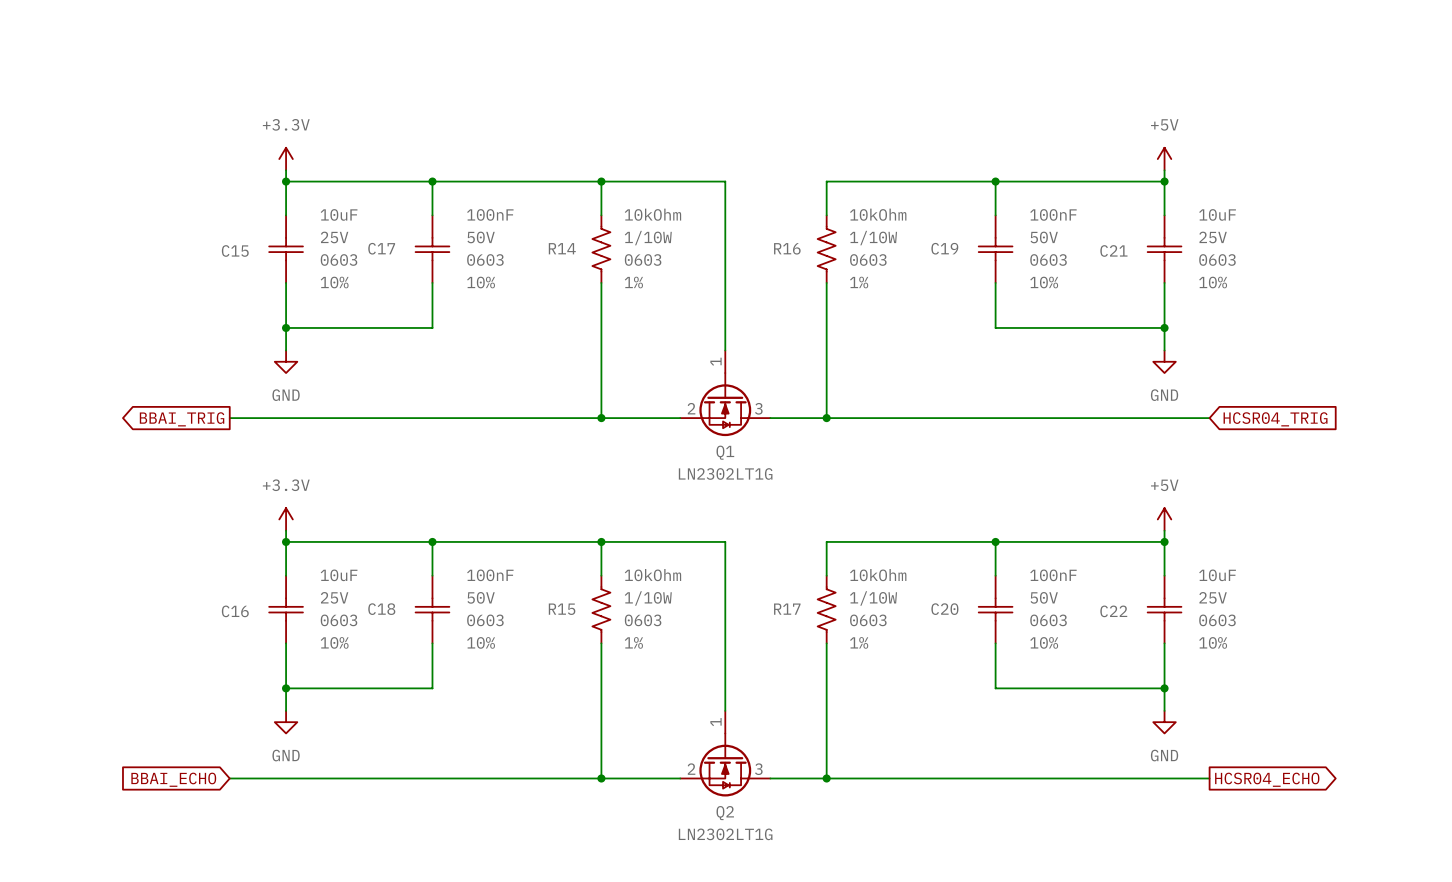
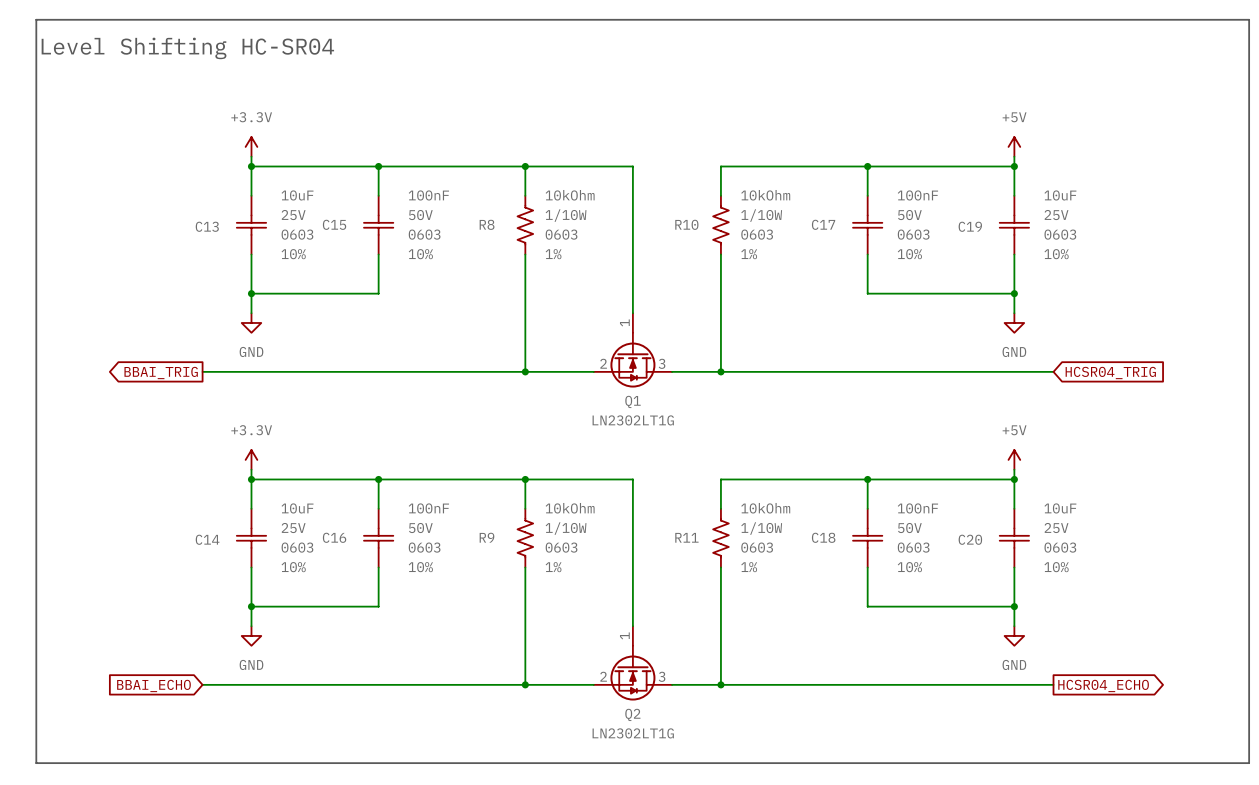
line: none -> (36, 19) (1249, 19) (1249, 763) (36, 763) (36, 19)
text: none -> Level Shifting HC-SR04 (187, 48)
C17 name: C17 (381, 248) -> C15 (334, 224)
R14 name: R14 (562, 248) -> R8 (487, 224)
R16 name: R16 (787, 248) -> R10 (686, 224)
C19 name: C19 (944, 248) -> C17 (823, 224)
C15 name: C15 (235, 250) -> C13 (207, 226)
C21 name: C21 (1113, 250) -> C19 (970, 226)
C18 name: C18 (381, 609) -> C16 (334, 537)
R15 name: R15 (562, 609) -> R9 (486, 537)
R17 name: R17 (787, 609) -> R11 (686, 537)
C20 name: C20 (944, 609) -> C18 (823, 537)
C16 name: C16 (235, 611) -> C14 (207, 539)
C22 name: C22 (1113, 611) -> C20 (970, 539)

